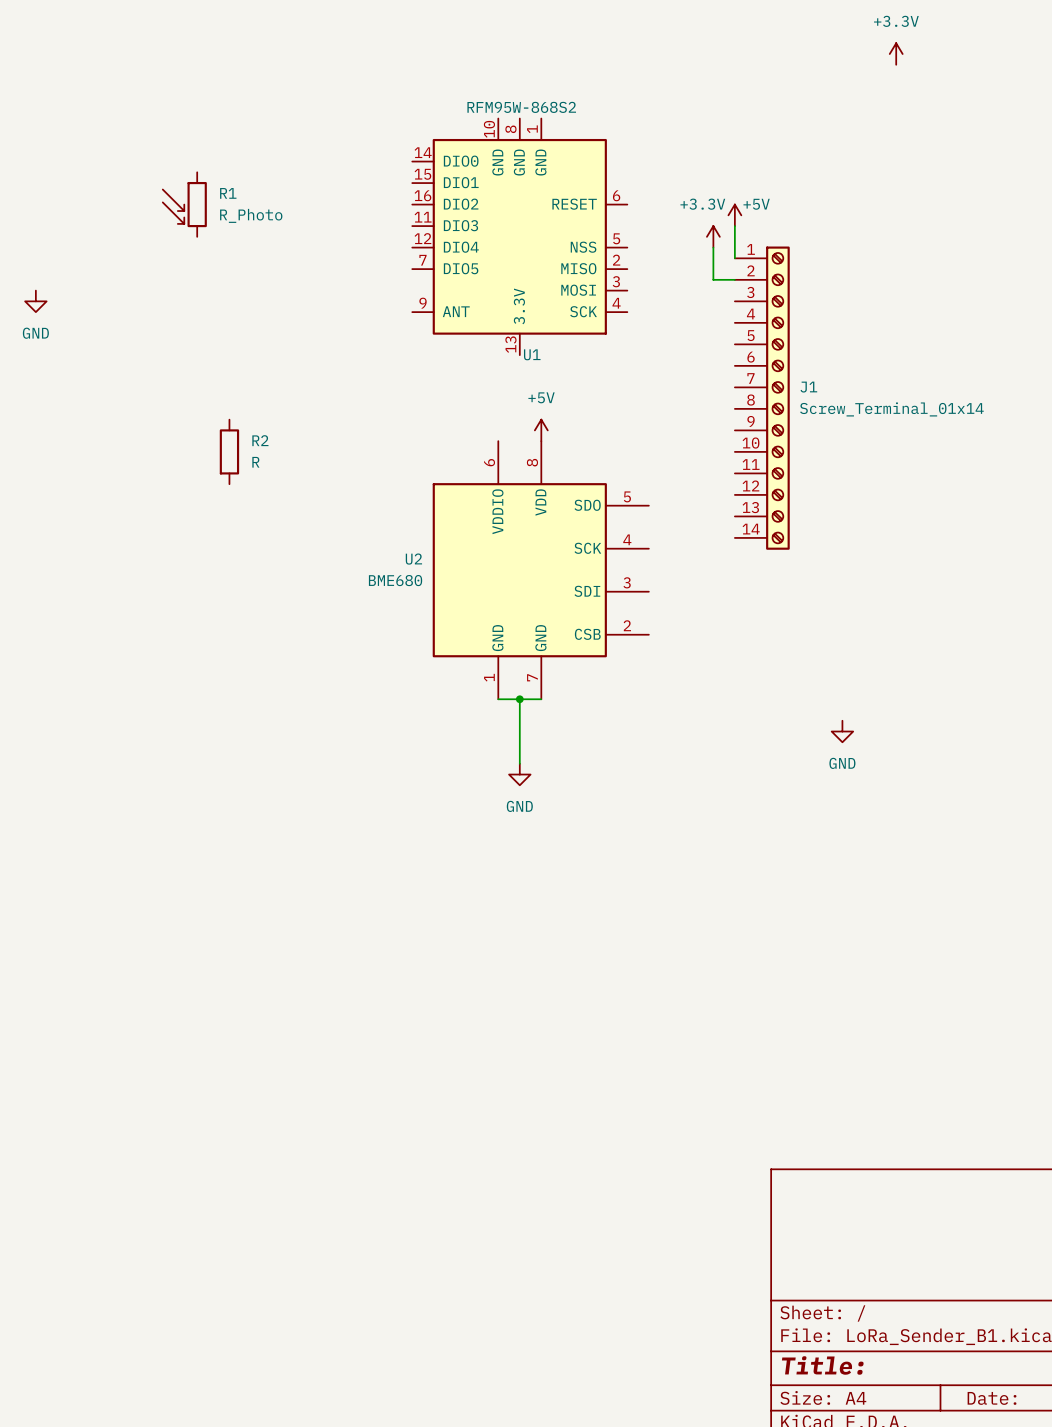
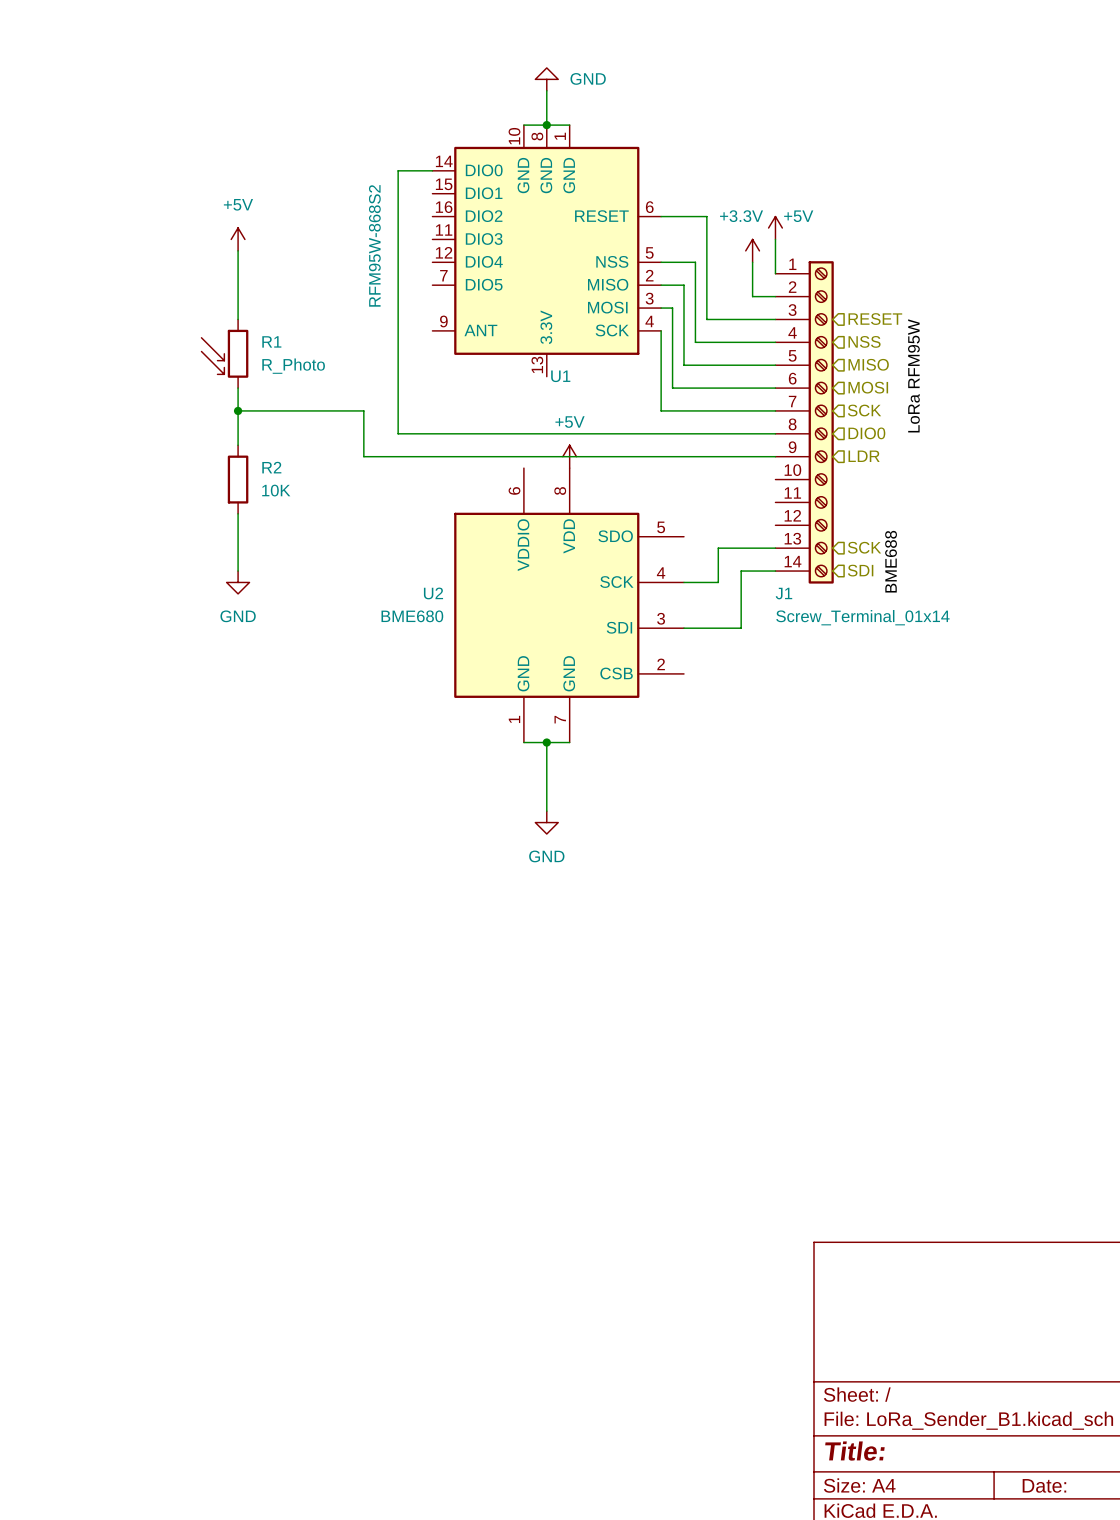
power symbol: +3.3V (896, 54) -> none
power symbol: none -> GND (546, 79)
wire: none -> (546, 90) (546, 125)
U1 value rotation: 0° (521, 107) -> 90° counterclockwise (374, 245)
U1 value position: RFM95W-868S2 (521, 107) -> RFM95W-868S2 (374, 245)
wire: none -> (523, 125) (569, 125)
junction: none -> (546, 125)
wire: none -> (432, 170) (398, 170) (398, 433) (775, 433)
R1 position: (184, 204) -> (224, 353)
wire: none -> (661, 216) (706, 216) (706, 319) (775, 319)
power symbol: none -> +5V (238, 239)
wire: none -> (238, 250) (238, 319)
wire: none -> (661, 262) (695, 262) (695, 342) (775, 342)
wire: none -> (661, 285) (683, 285) (683, 365) (775, 365)
wire: none -> (661, 308) (672, 308) (672, 388) (775, 388)
hierarchical label: none -> RESET (875, 319)
power symbol: GND (35, 301) -> none
wire: none -> (661, 330) (661, 410) (775, 410)
hierarchical label: none -> NSS (864, 341)
hierarchical label: none -> MISO (868, 364)
label: none -> LoRa RFM95W (913, 375)
wire: none -> (238, 388) (238, 445)
hierarchical label: none -> MOSI (868, 387)
hierarchical label: none -> SCK (864, 410)
wire: none -> (238, 410) (363, 410) (363, 456) (775, 456)
junction: none -> (238, 410)
J1 name position: J1 (808, 387) -> J1 (783, 593)
hierarchical label: none -> DIO0 (866, 433)
J1 value position: Screw_Terminal_01x14 (891, 409) -> Screw_Terminal_01x14 (862, 617)
hierarchical label: none -> LDR (864, 456)
R2 value: R (255, 462) -> 10K (276, 490)
wire: none -> (238, 513) (238, 571)
wire: none -> (775, 548) (718, 548) (718, 582) (683, 582)
hierarchical label: none -> SCK (864, 547)
label: none -> BME688 (891, 561)
wire: none -> (775, 571) (741, 571) (741, 628) (683, 628)
hierarchical label: none -> SDI (860, 570)
power symbol: none -> GND (238, 582)
power symbol: GND (842, 731) -> none

